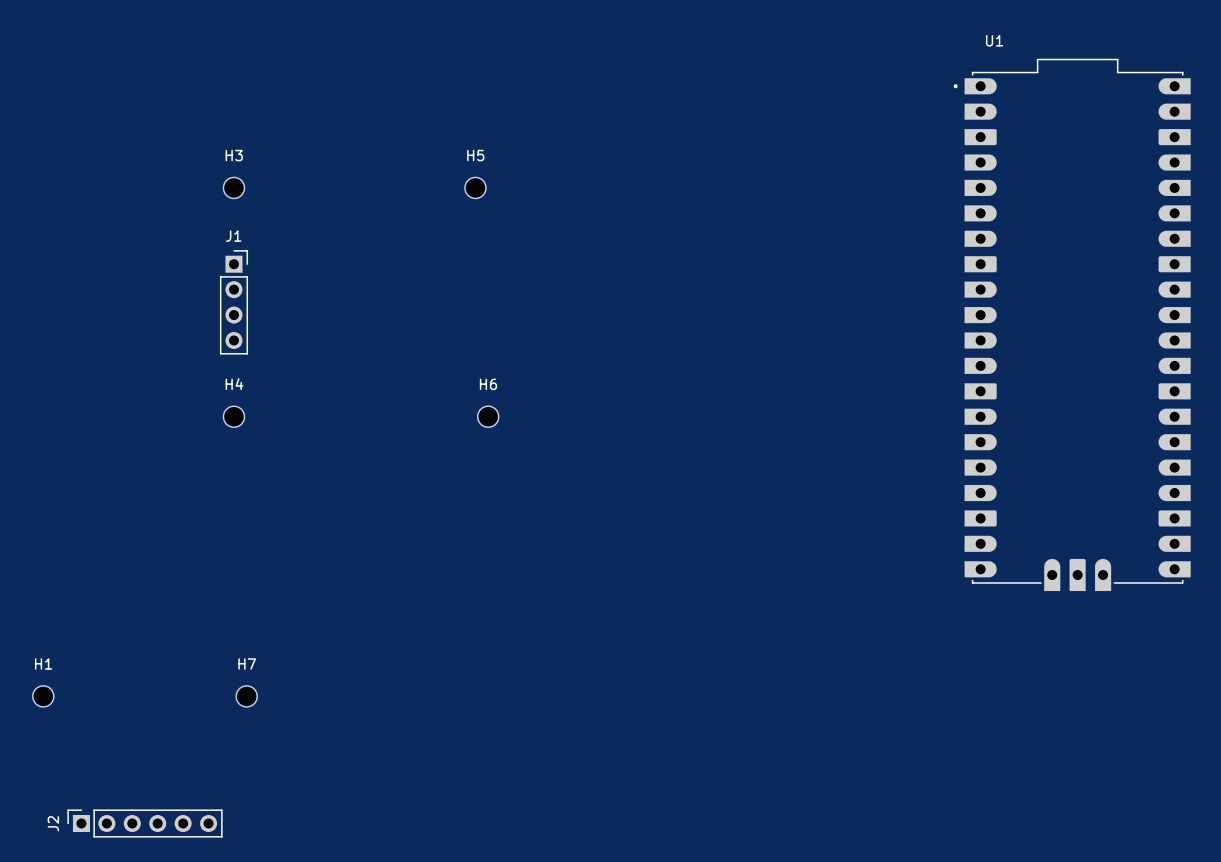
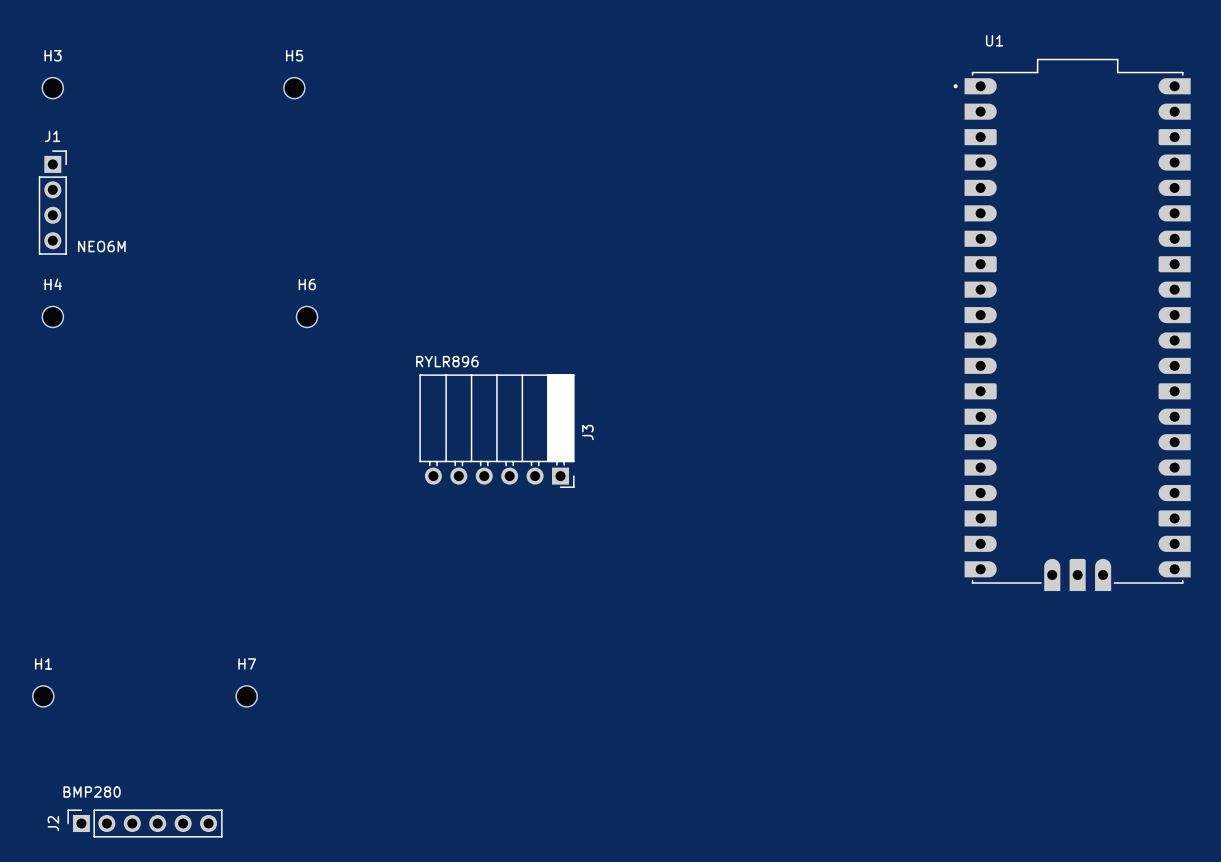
H3 position: (233, 187) -> (52, 88)
H5 position: (475, 187) -> (294, 88)
J1 text: none -> NEO6M (101, 246)
J1 position: (233, 302) -> (52, 202)
H4 position: (233, 416) -> (52, 316)
H6 position: (488, 416) -> (307, 316)
J3: none -> (496, 431)
J2 text: none -> BMP280 (92, 792)

